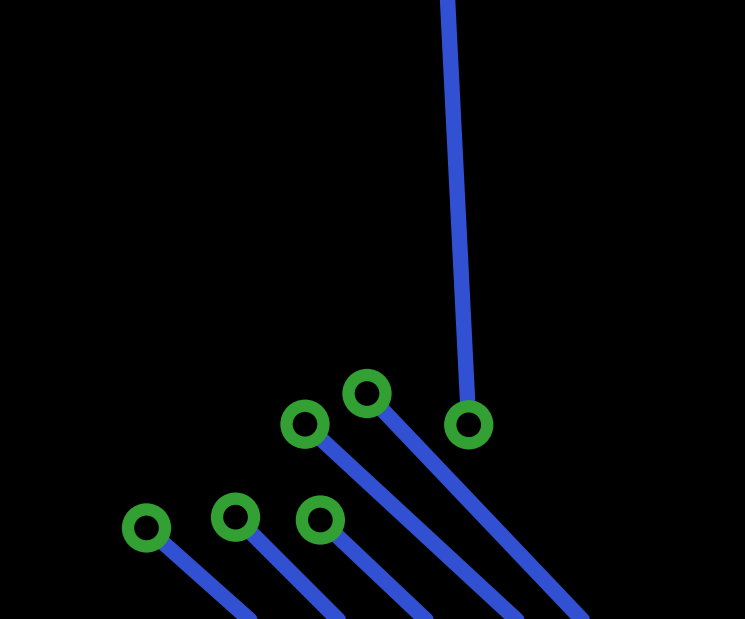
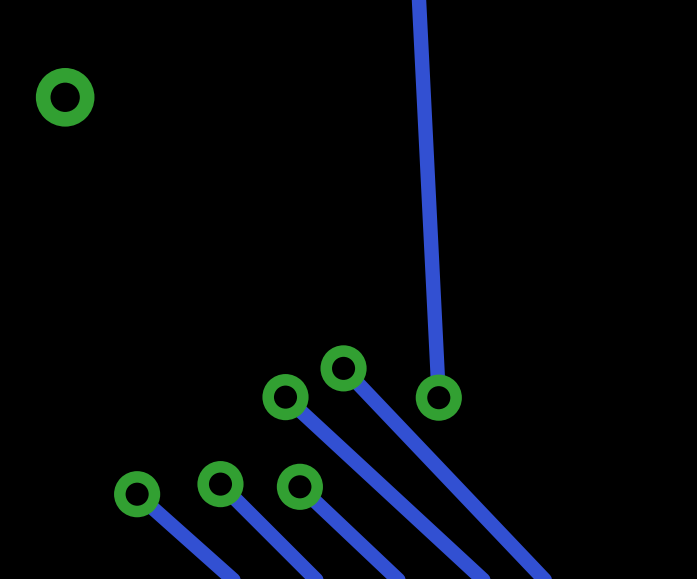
via: none -> (65, 97)

